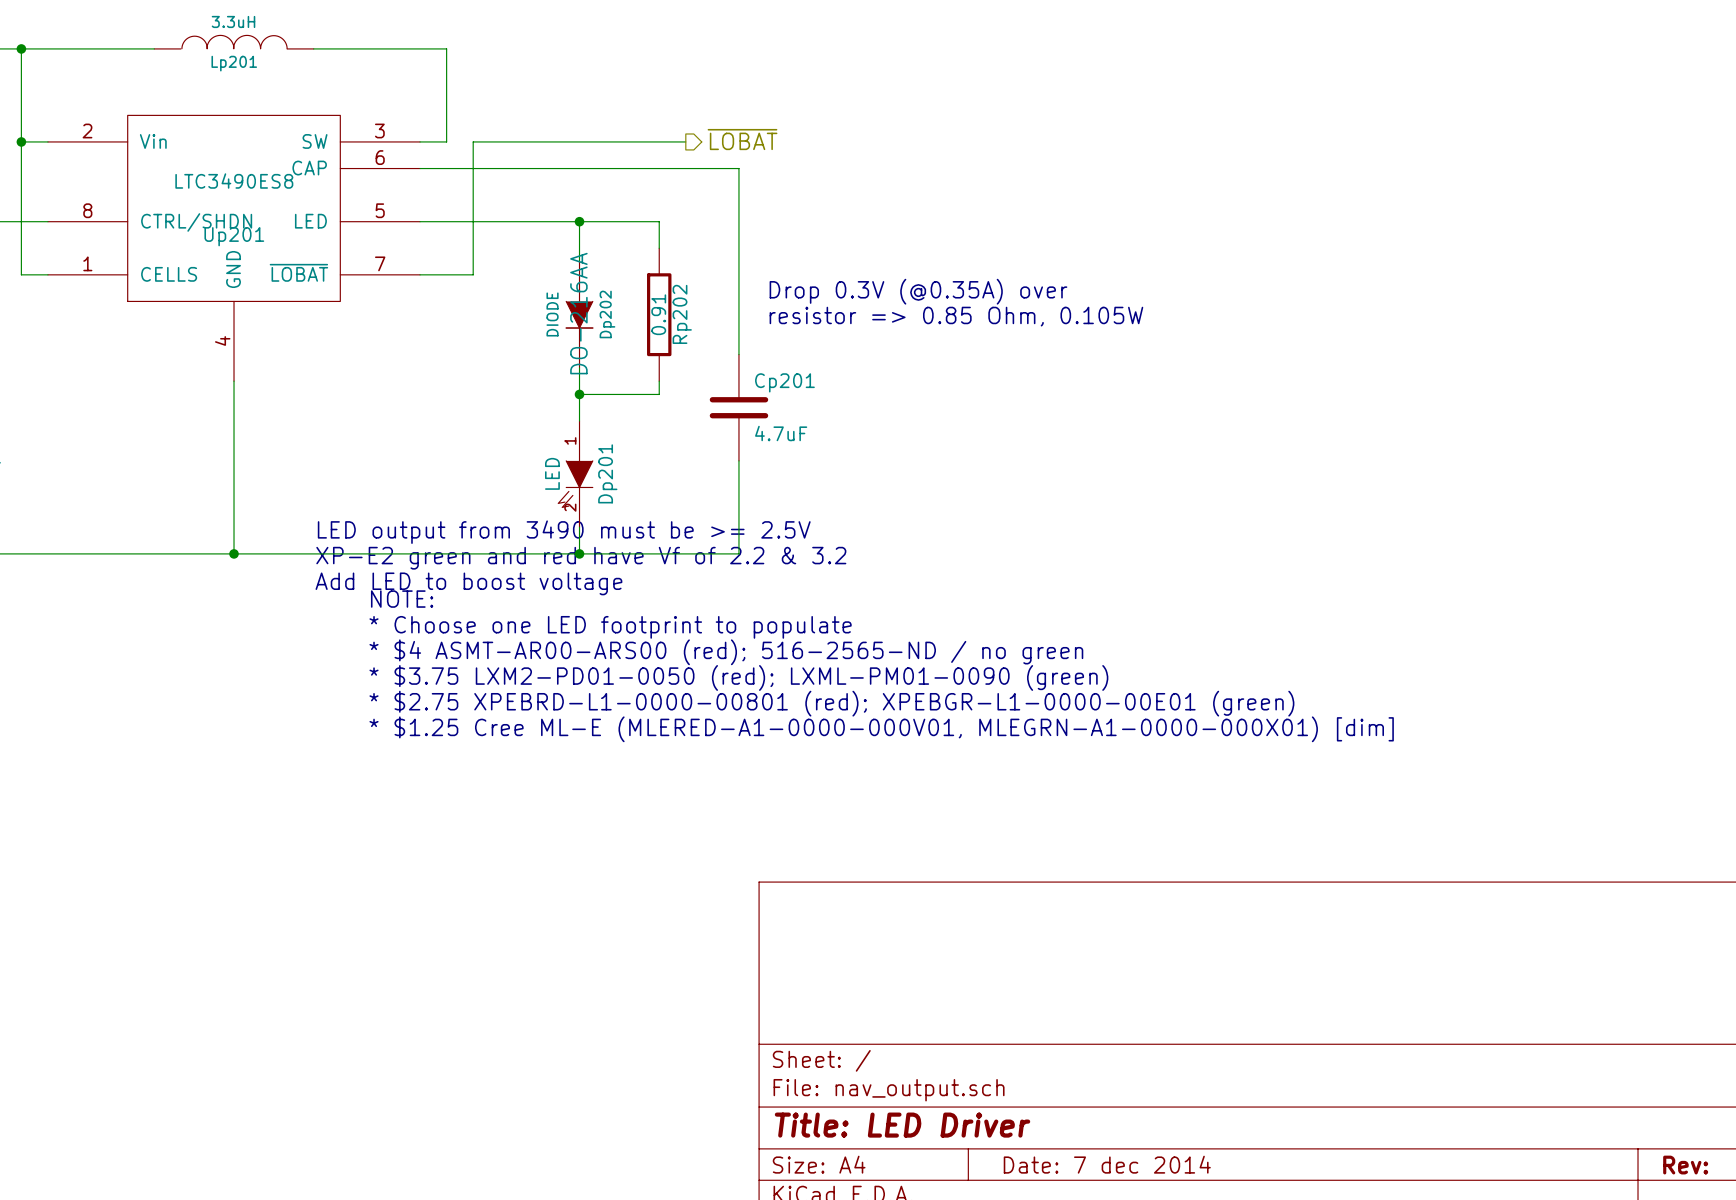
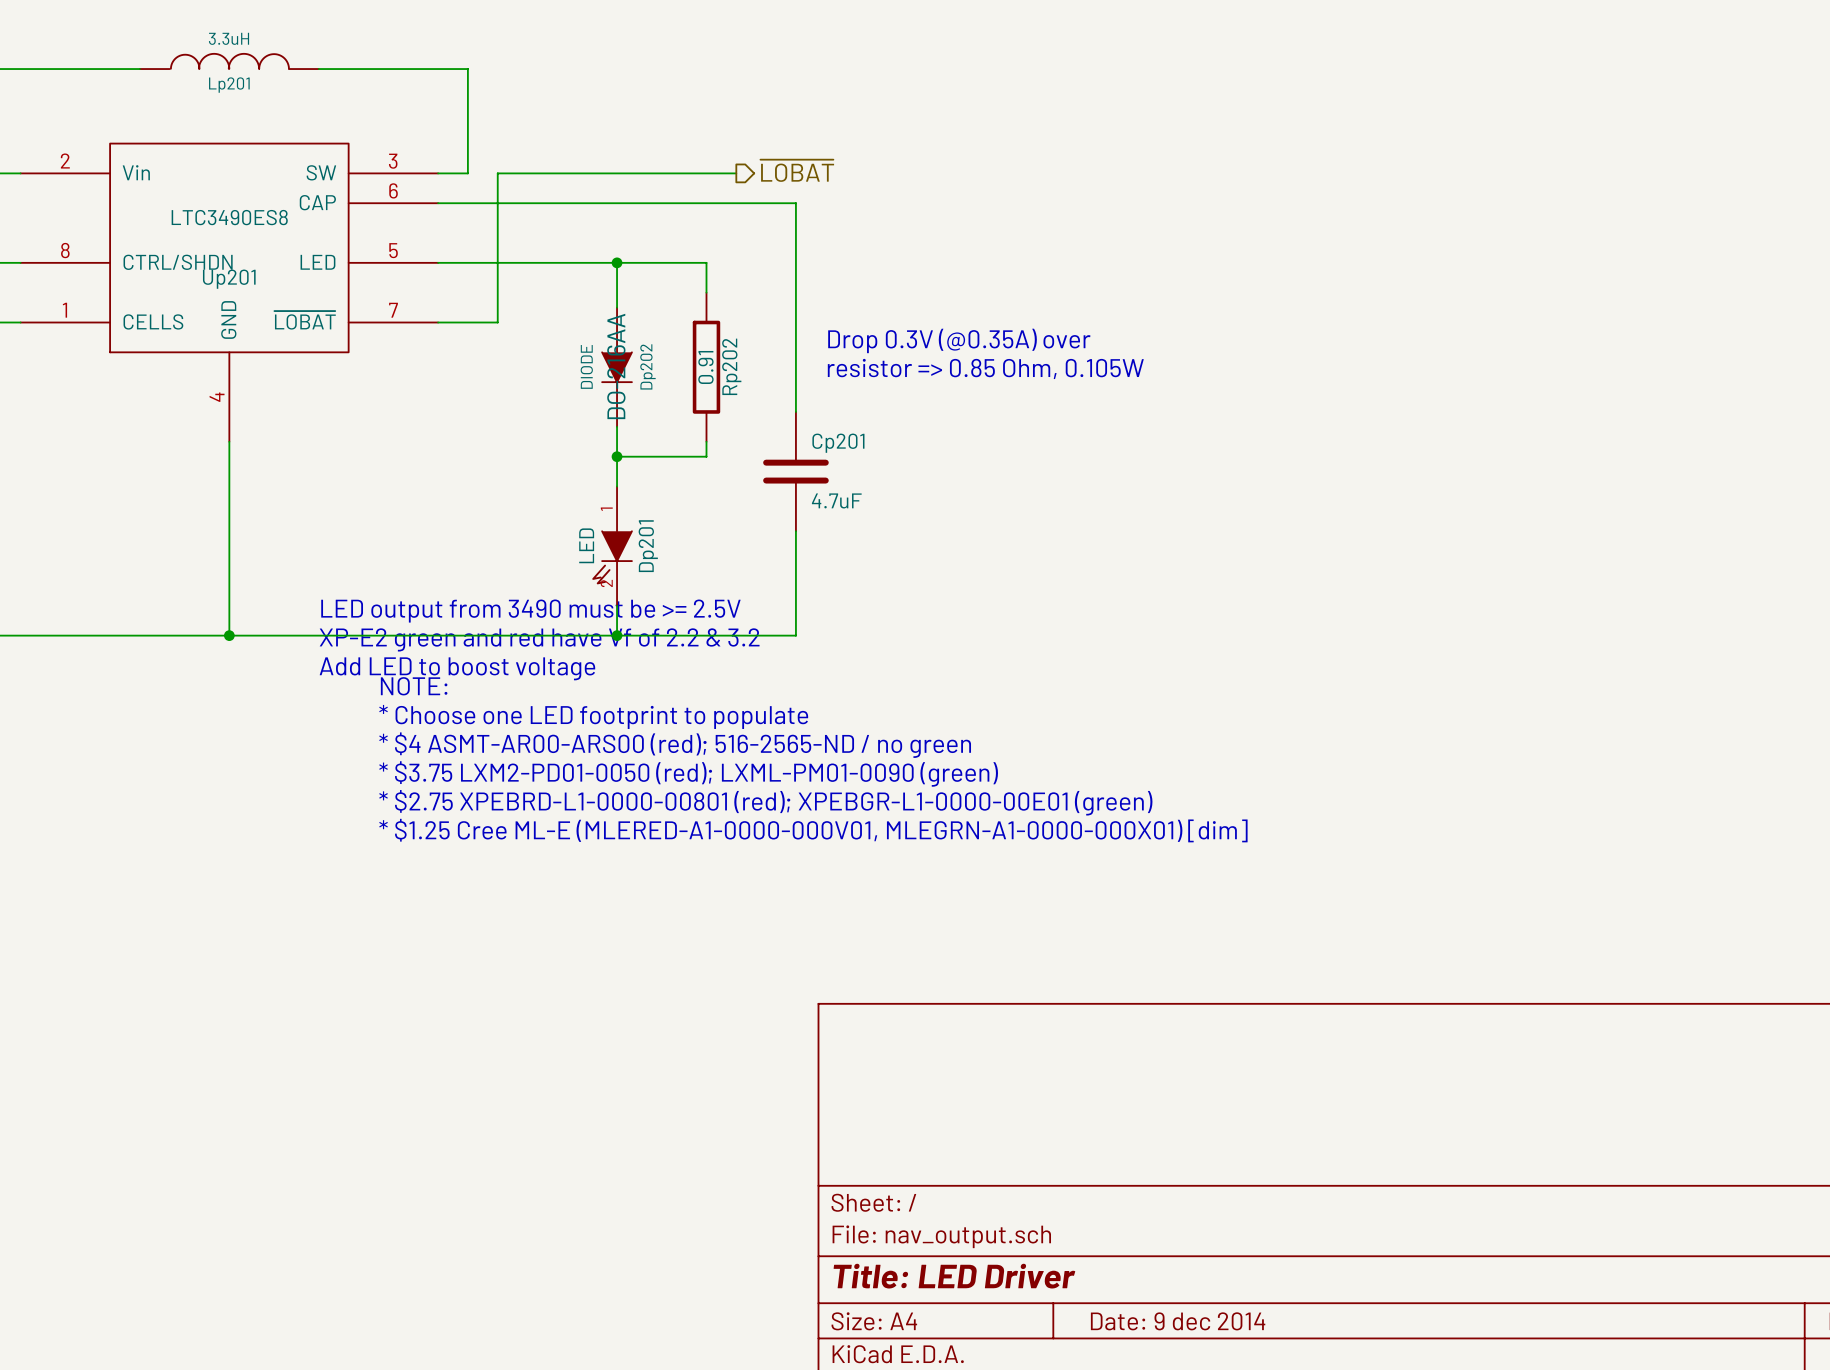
title block: Date: 7 dec 2014 (1107, 1164) -> Date: 9 dec 2014 (1178, 1321)

